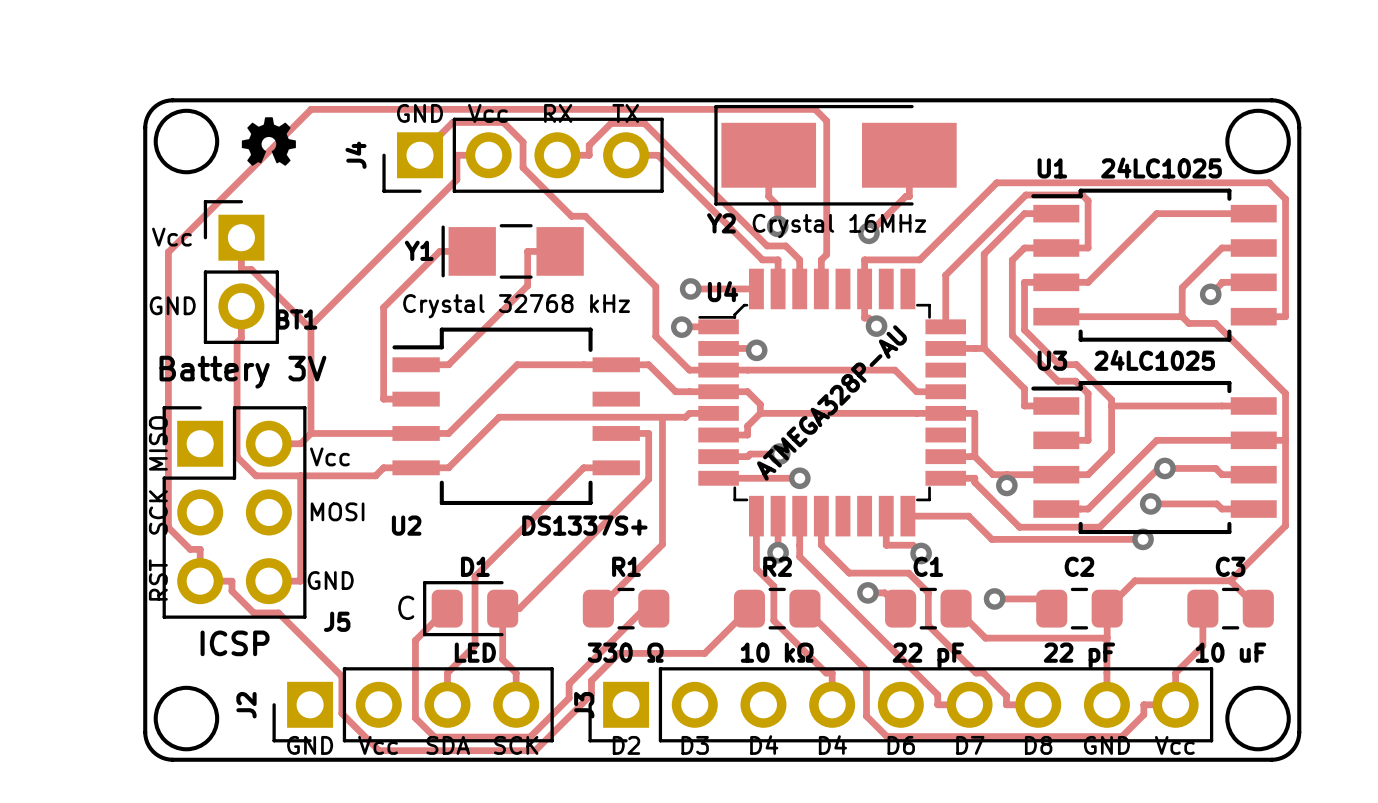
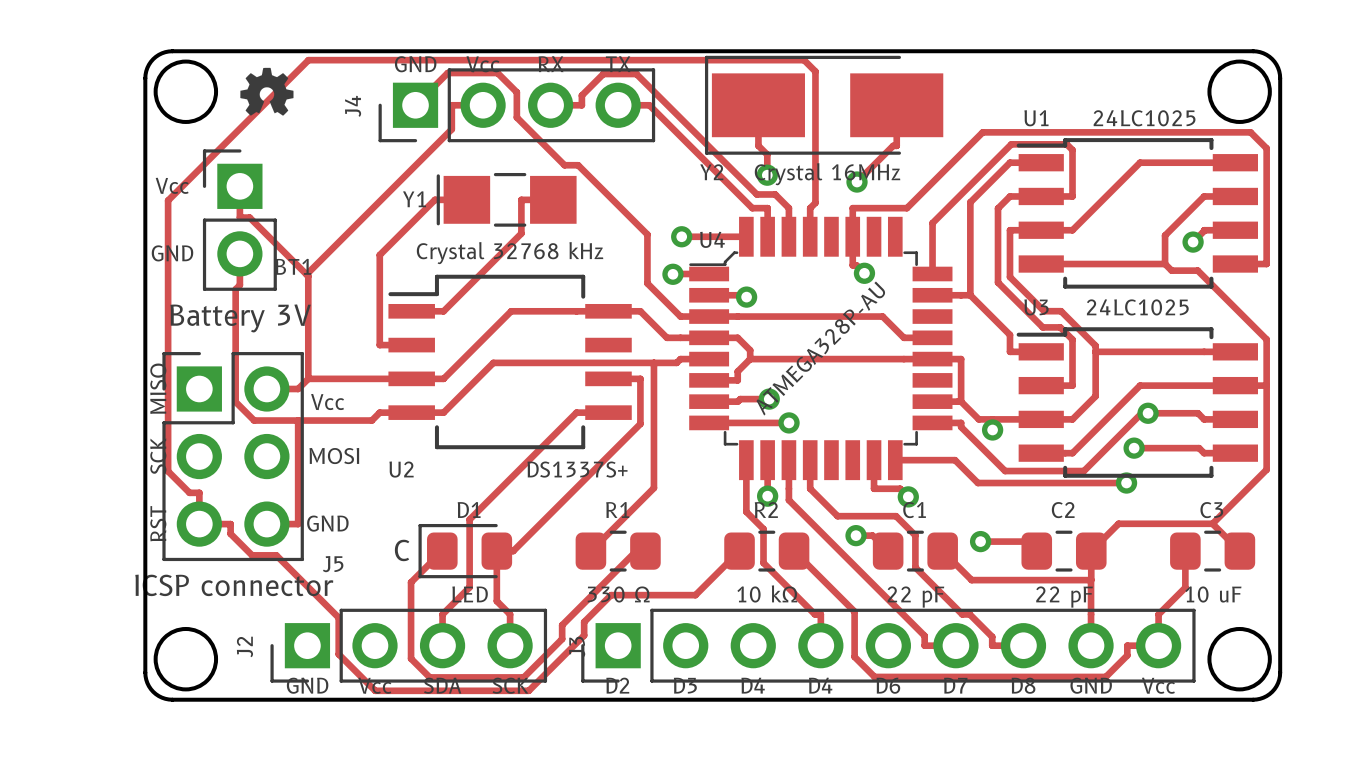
J5 value: ICSP (235, 643) -> ICSP connector (234, 585)

